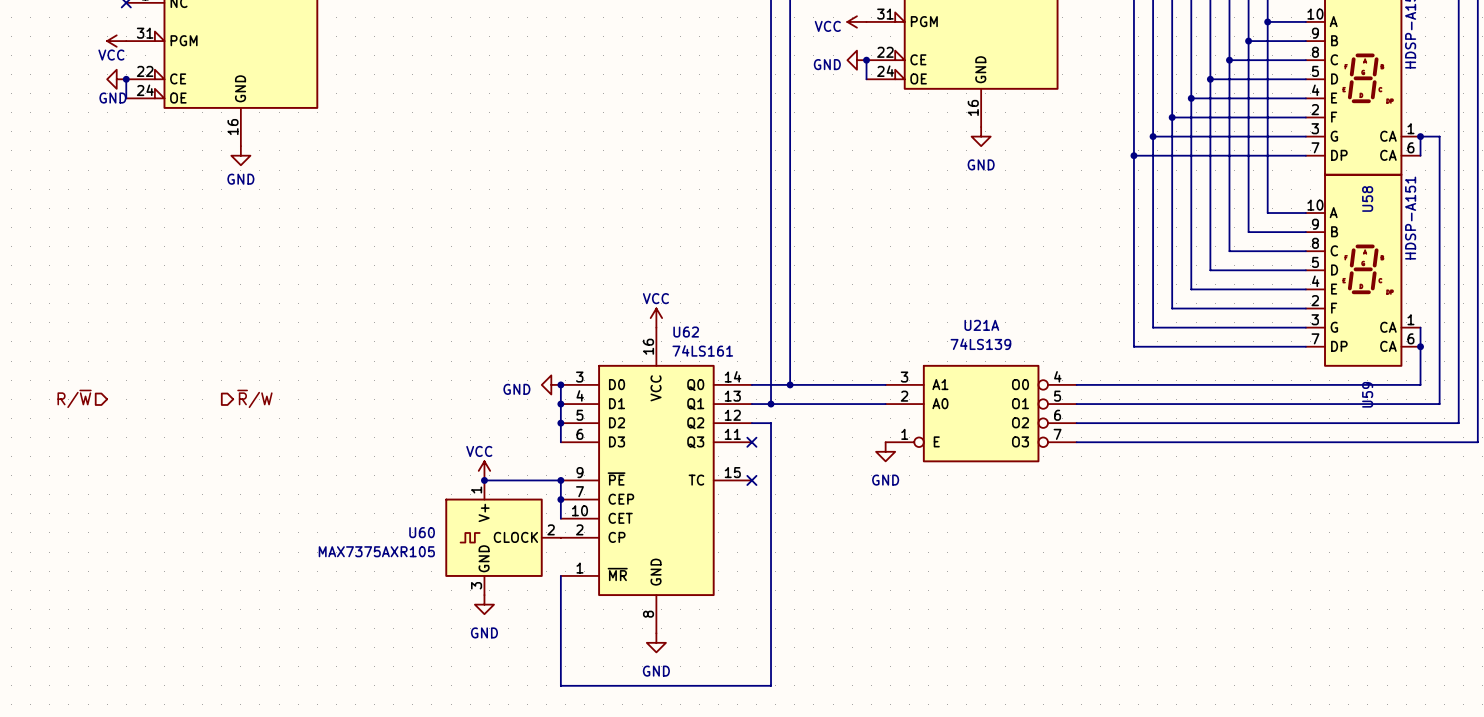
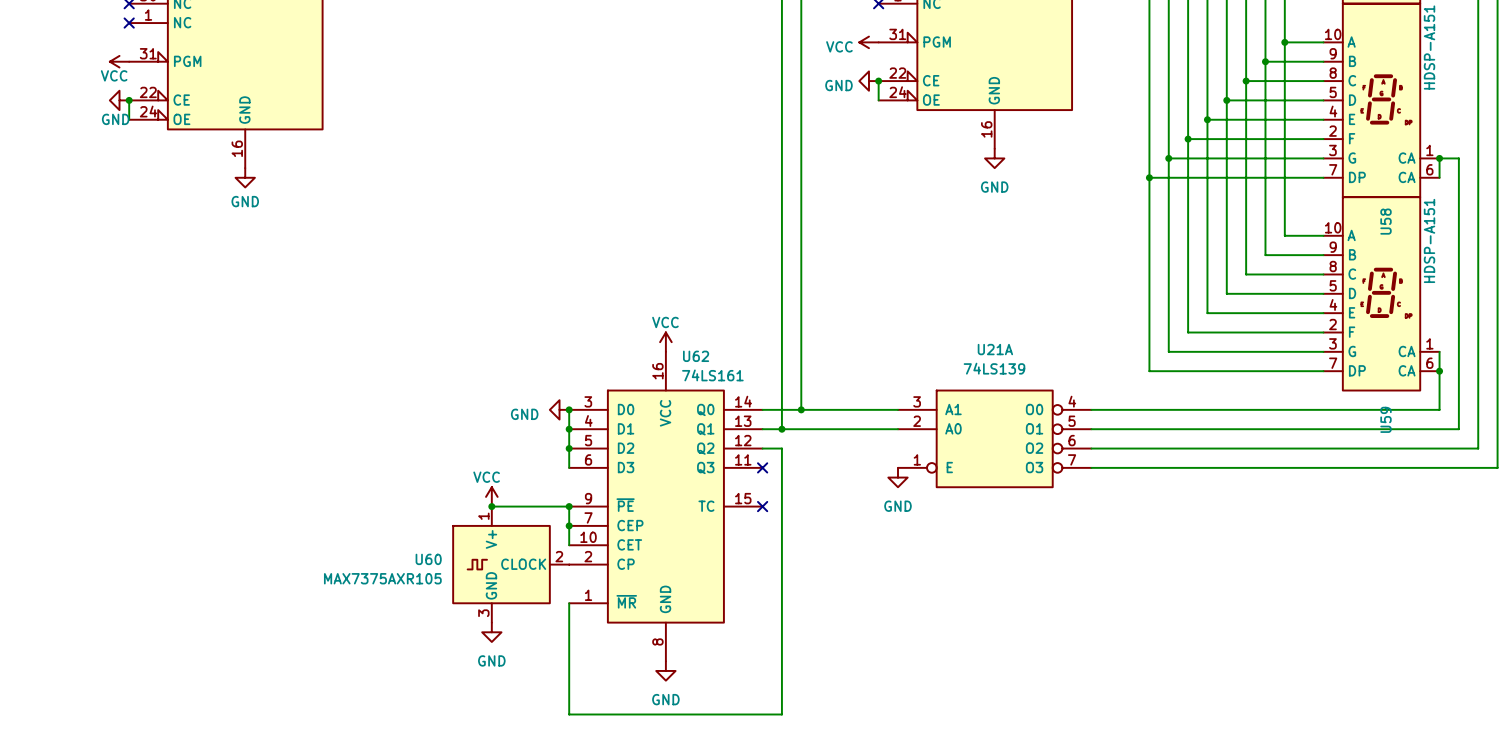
hierarchical label: R/~{W} (74, 398) -> none
hierarchical label: ~{R}/W (254, 398) -> none

